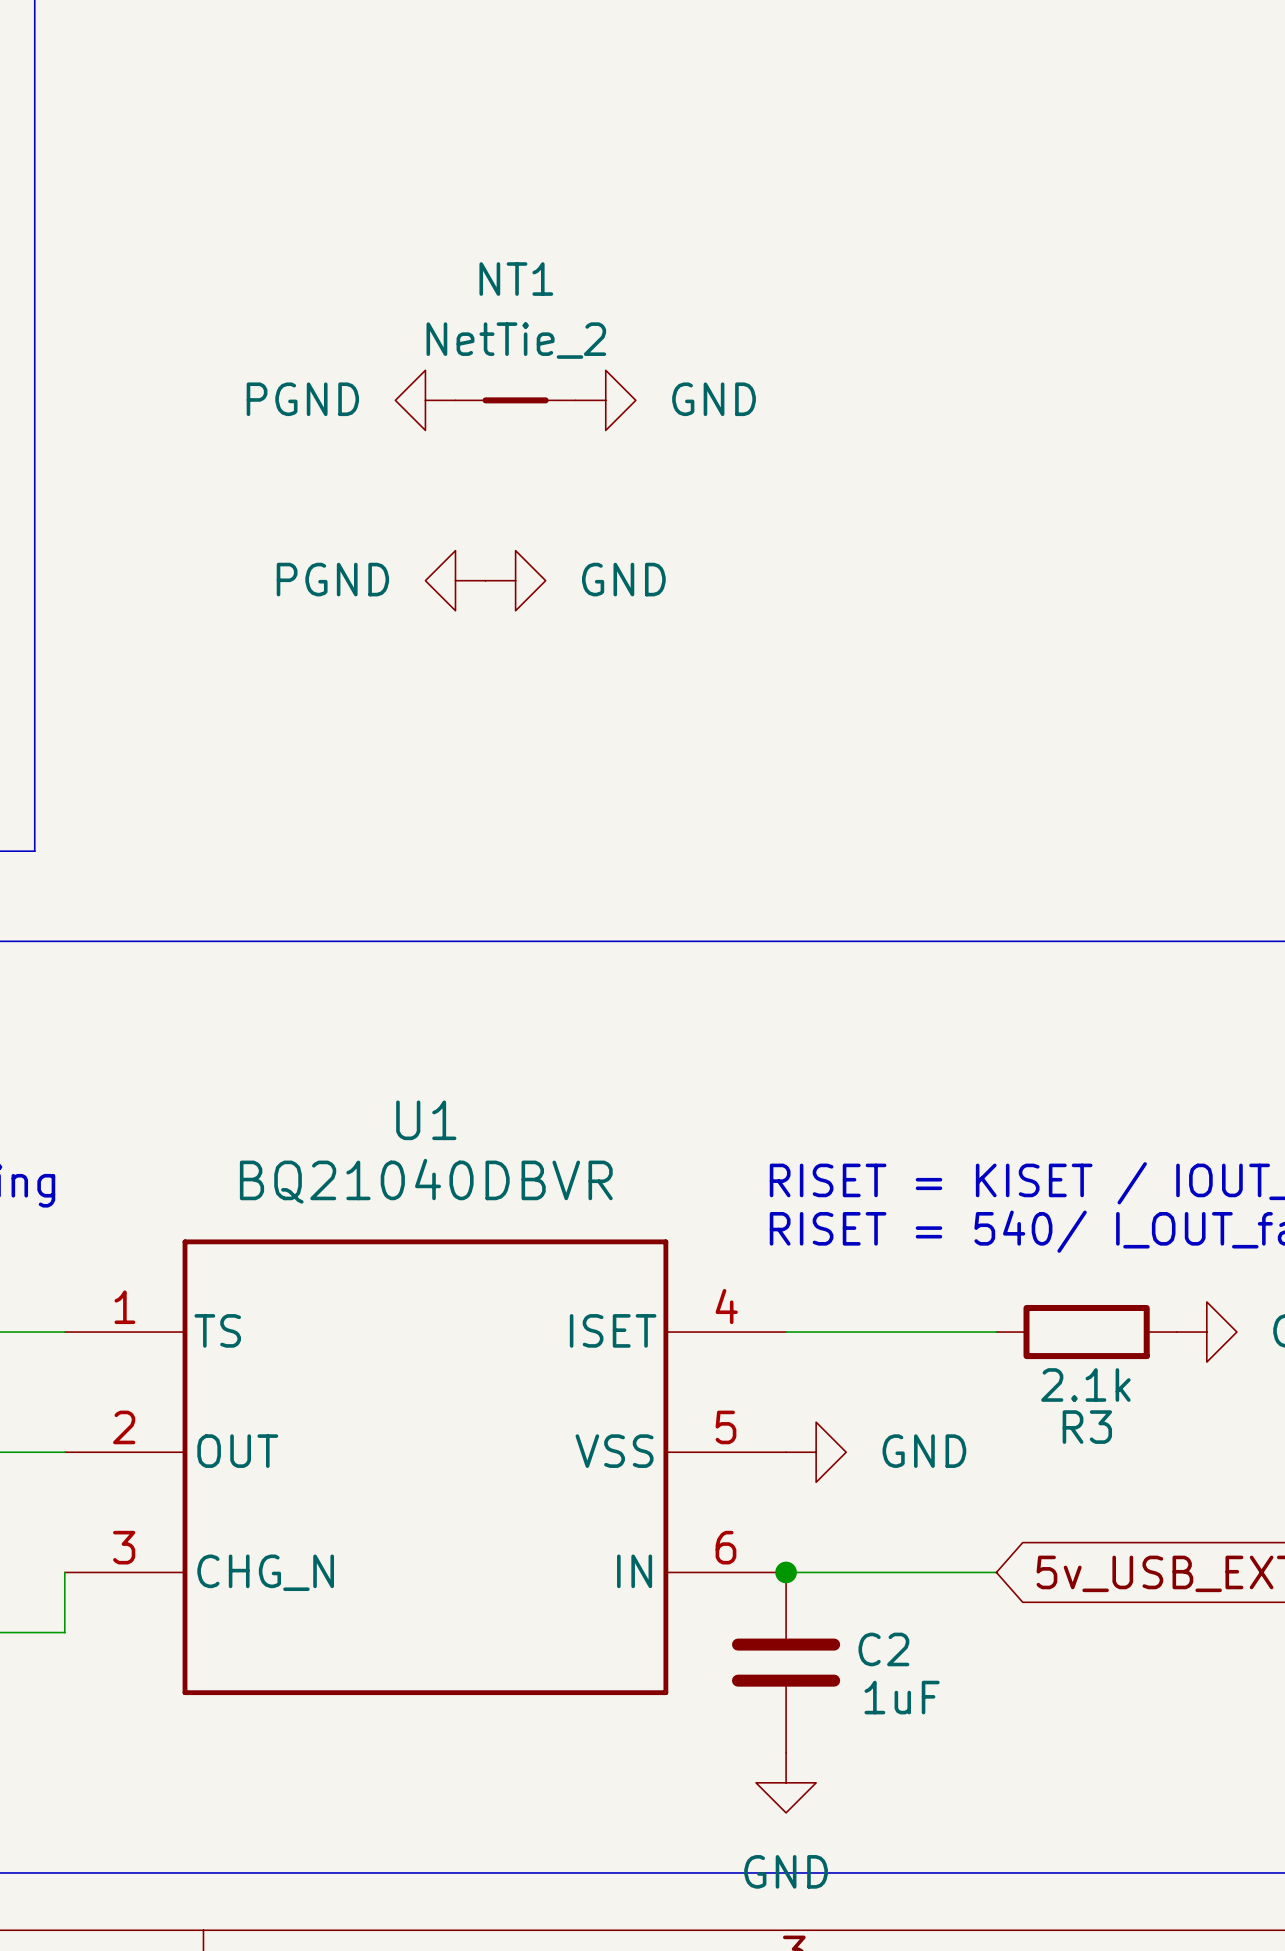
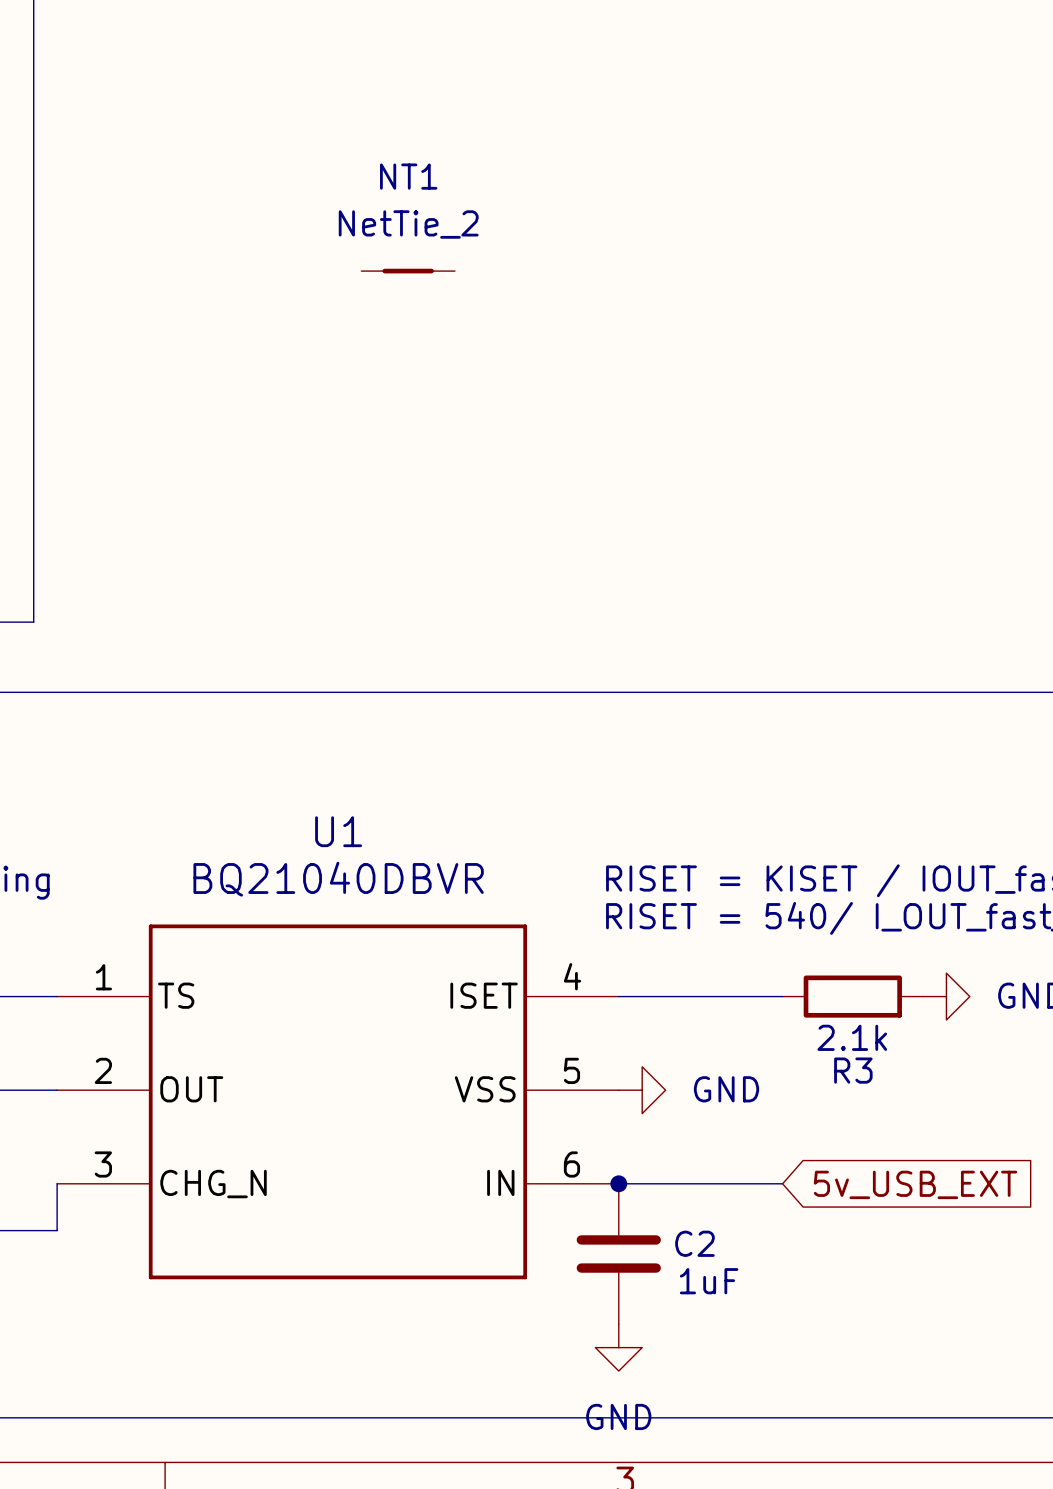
power symbol: PGND (425, 400) -> none
power symbol: GND (605, 400) -> none
power symbol: PGND (455, 580) -> none
power symbol: GND (515, 580) -> none

